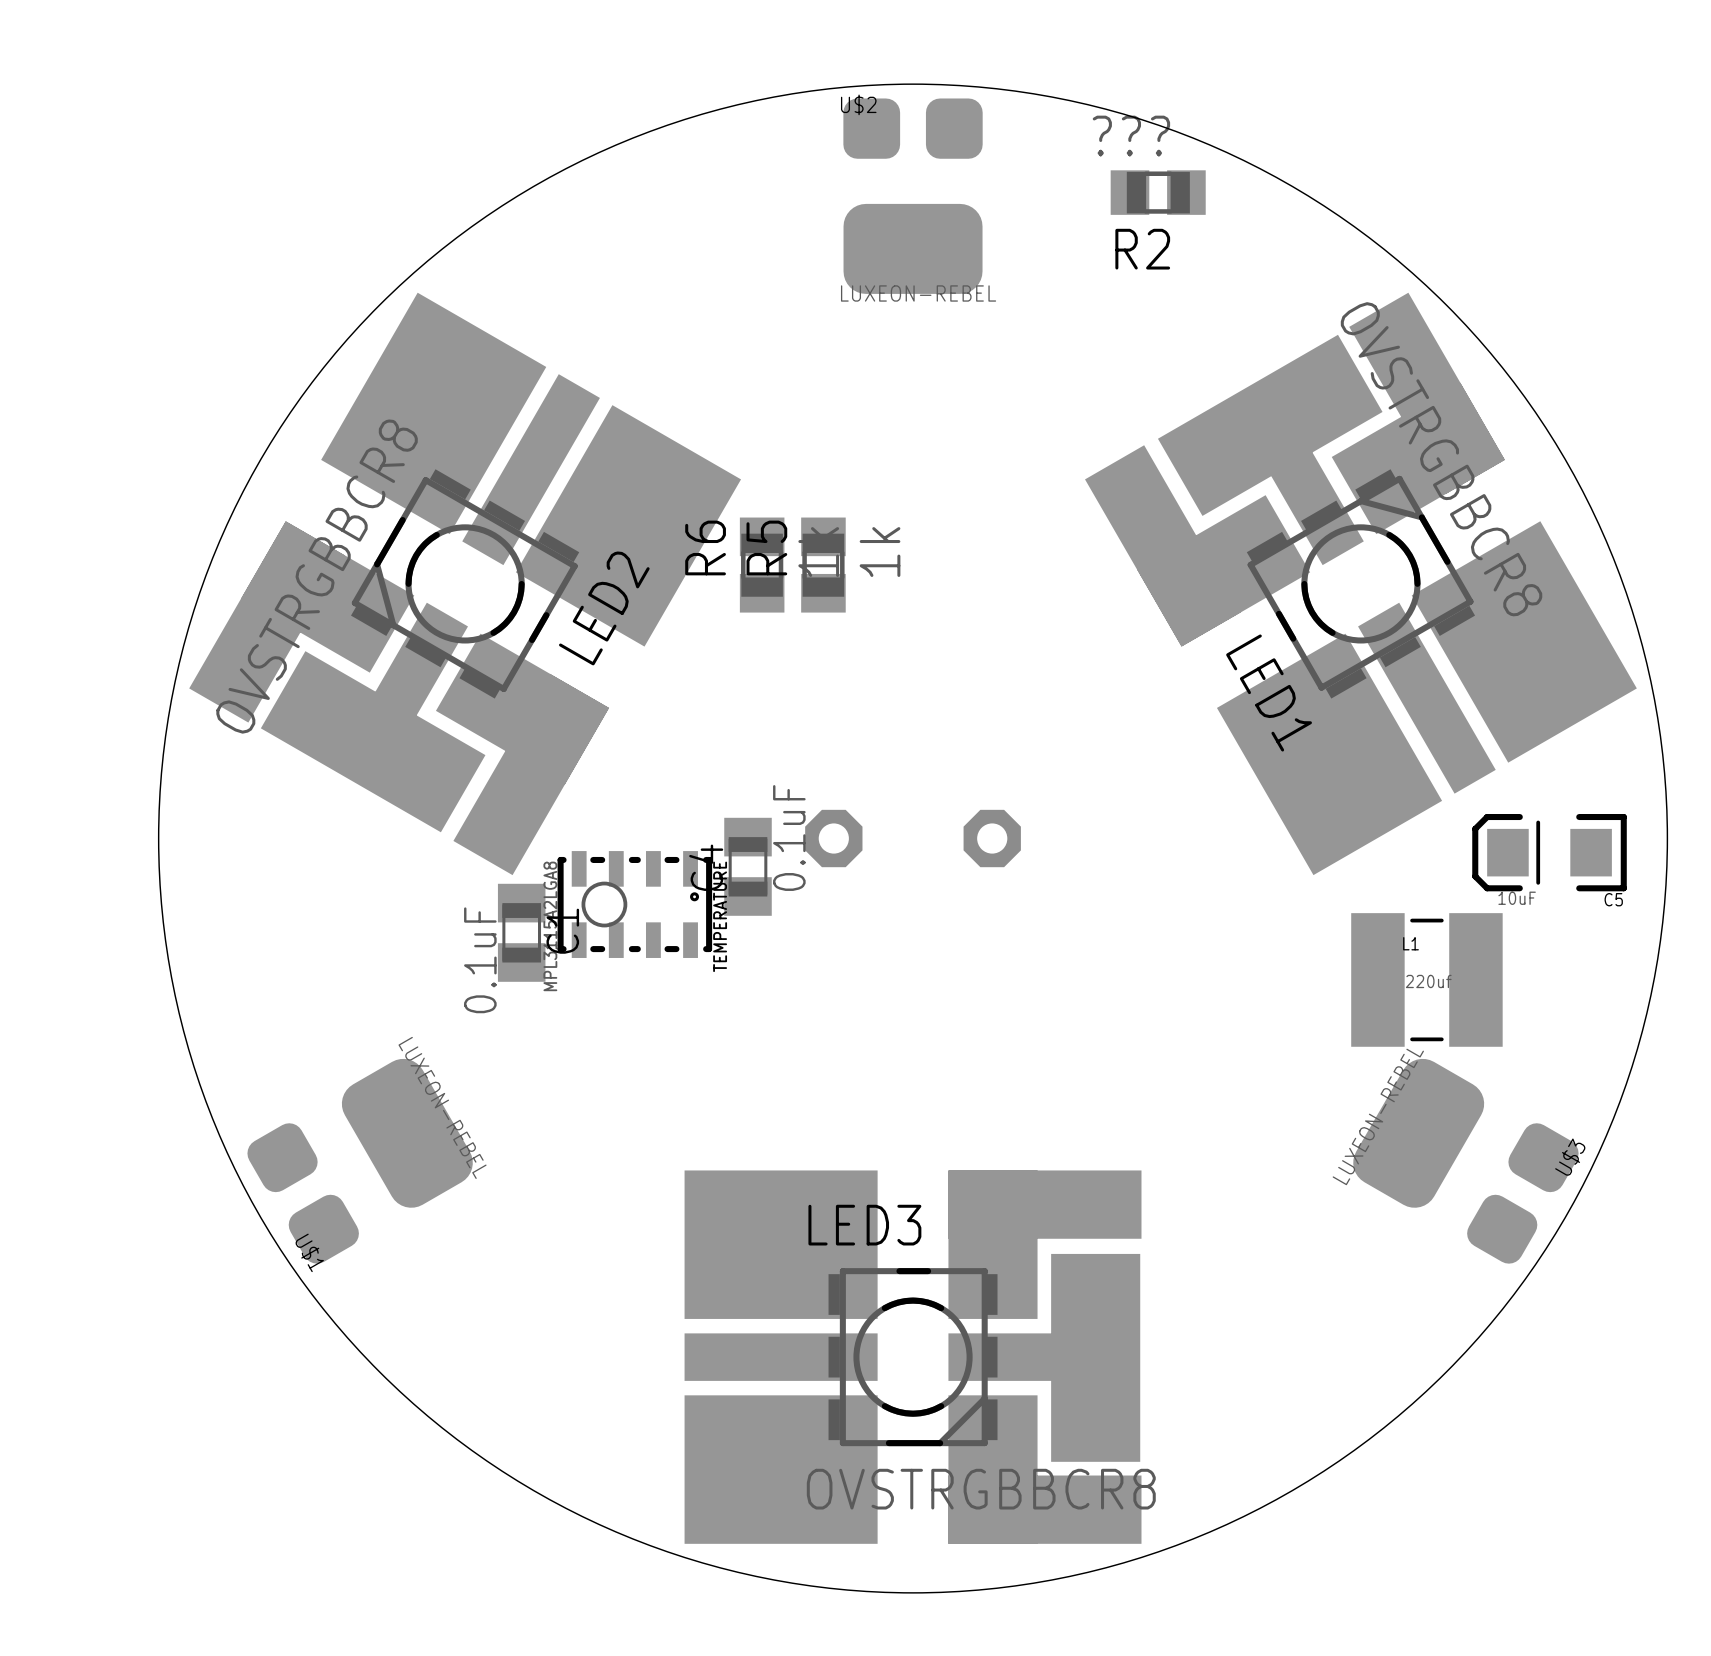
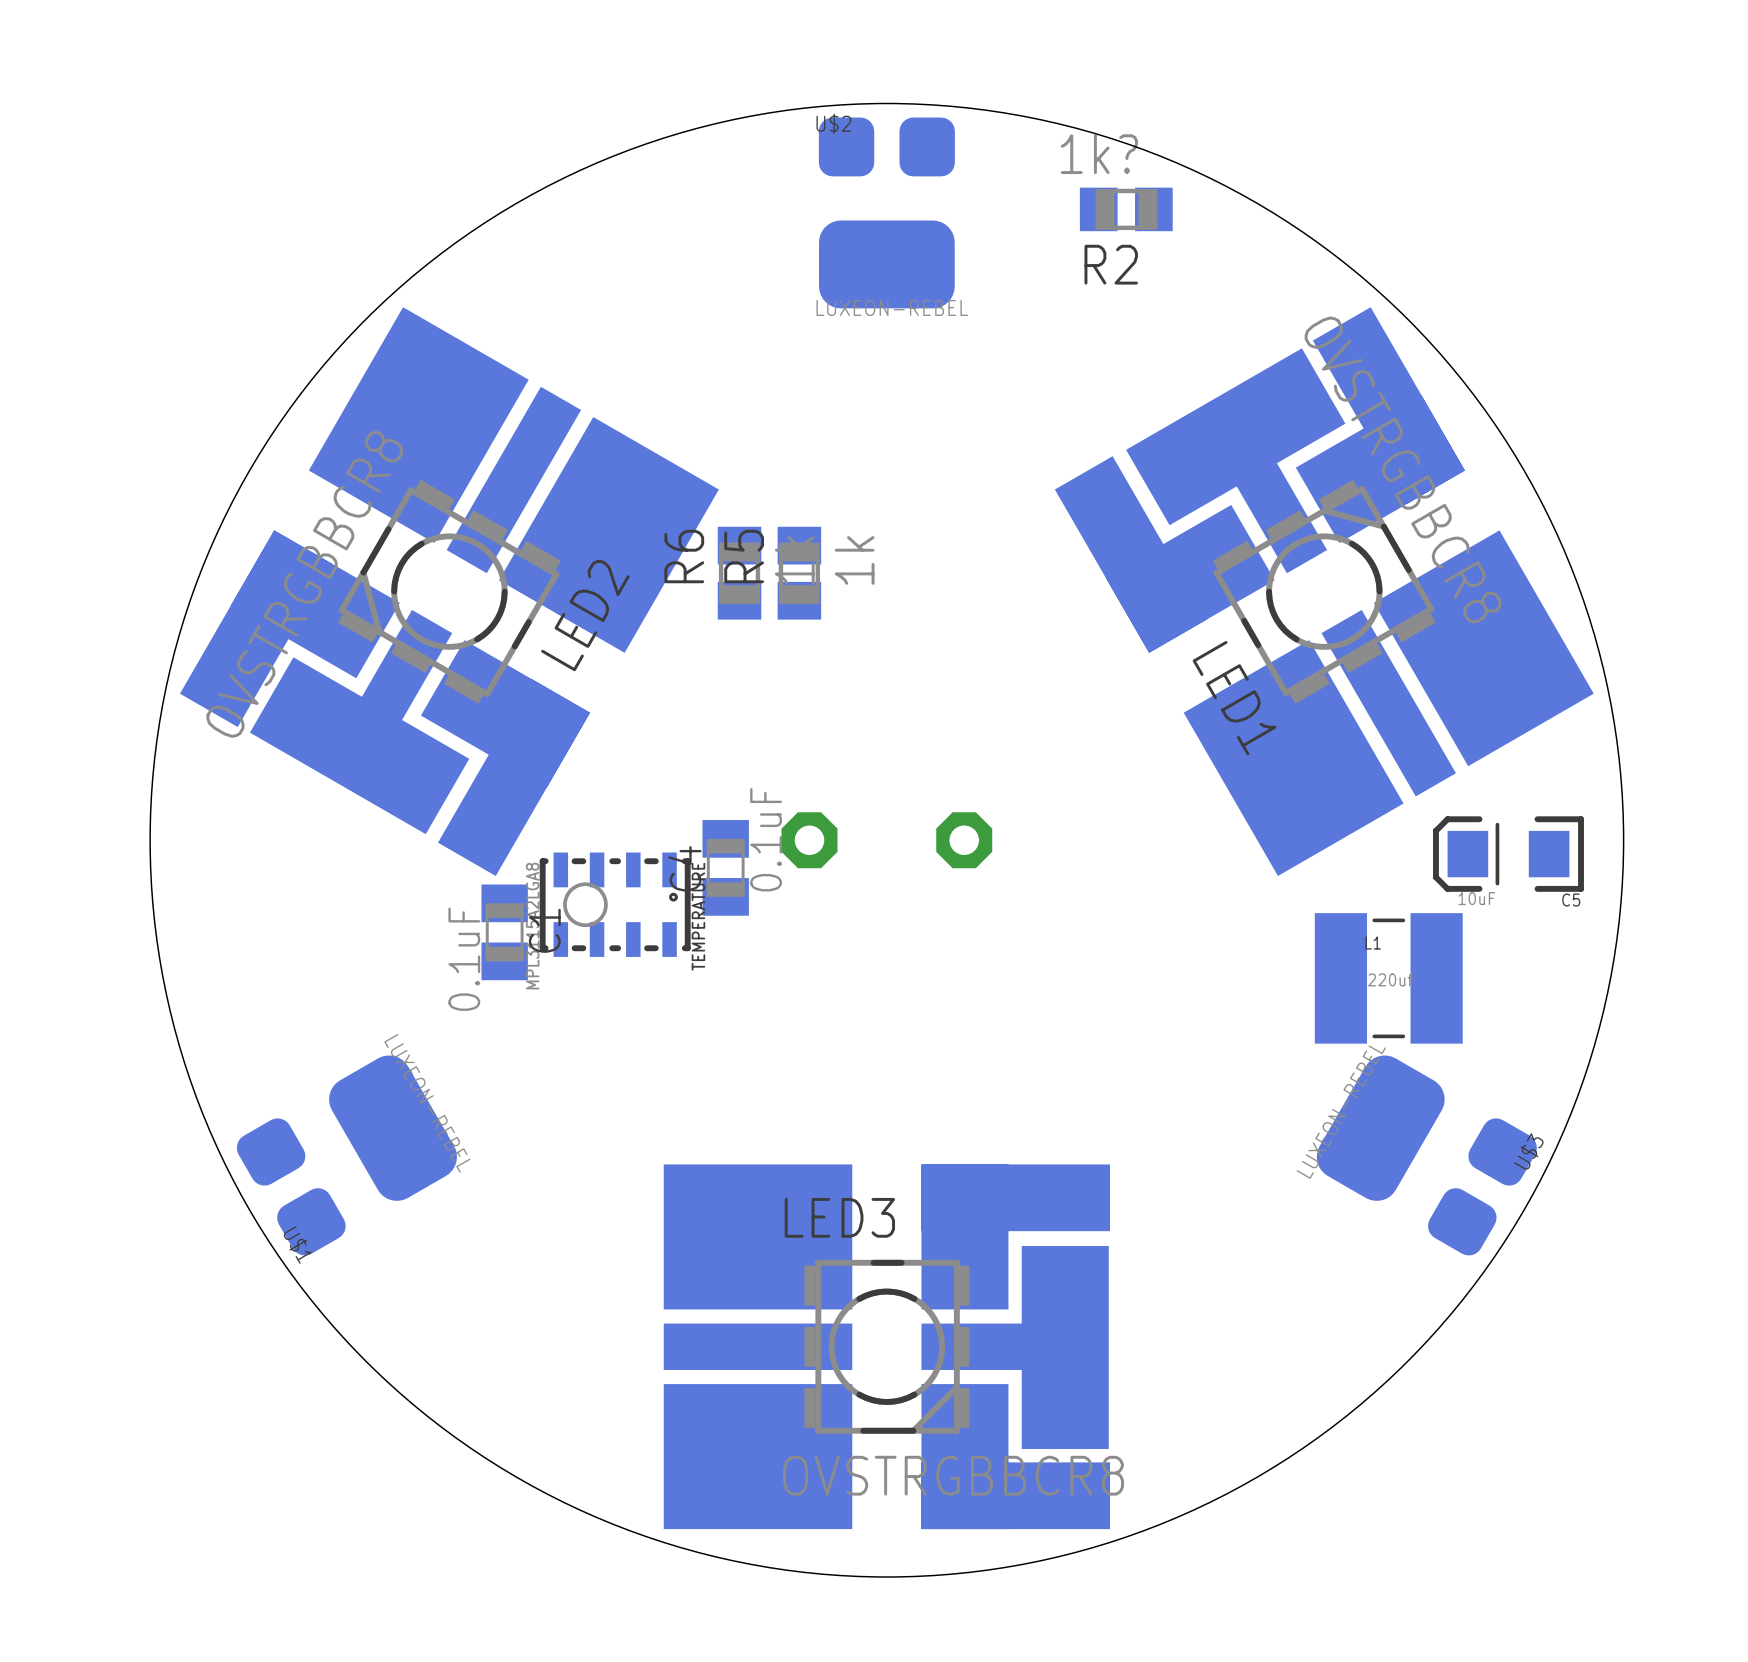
R2 value: ??? (1131, 136) -> 1k? (1099, 154)

